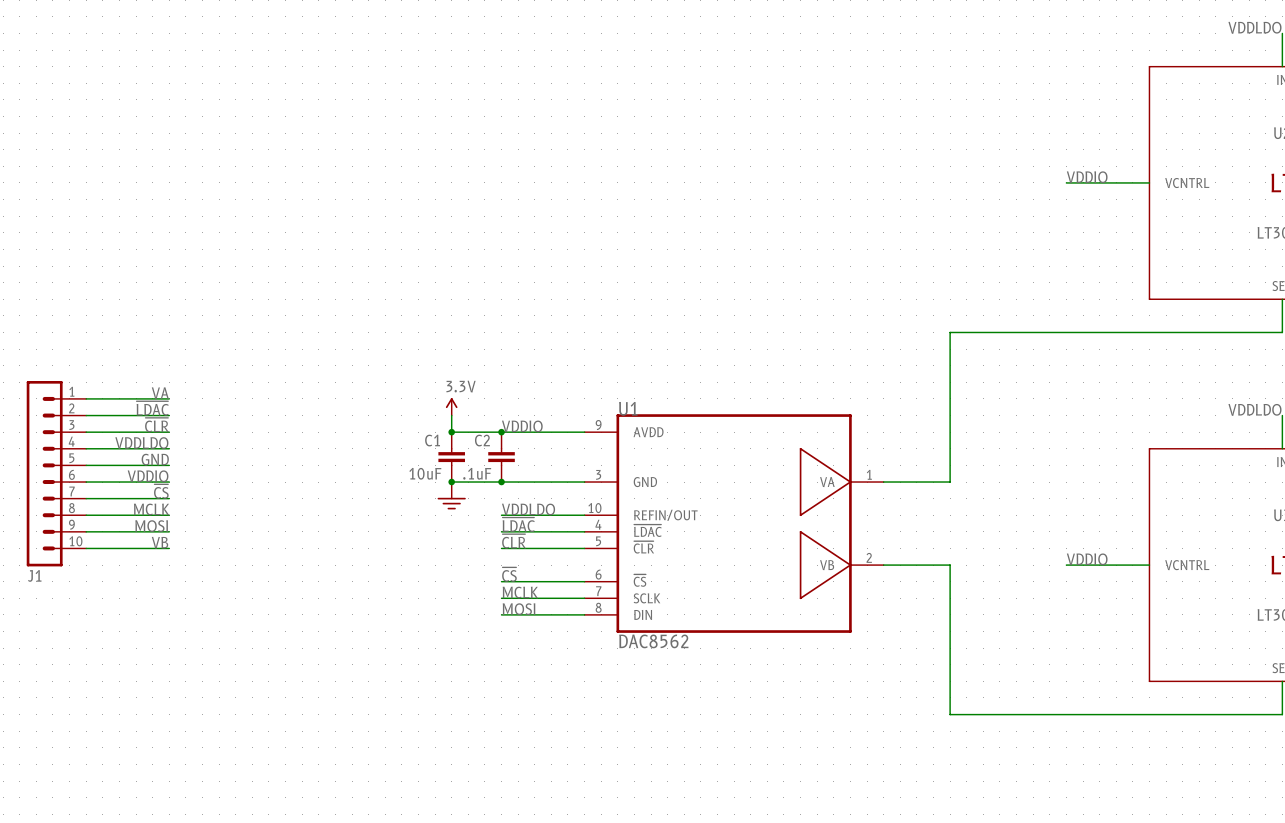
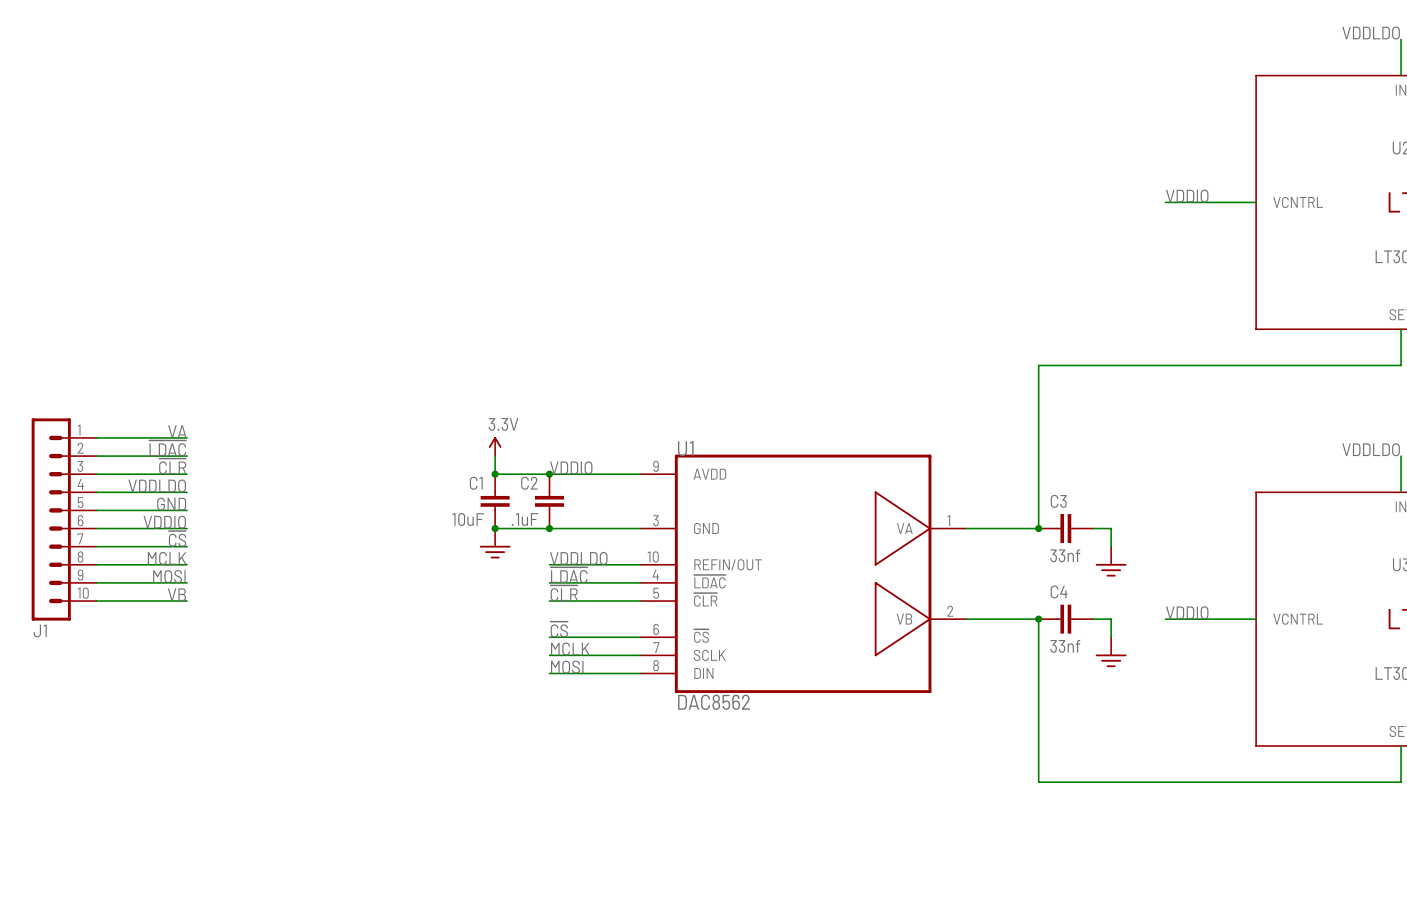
junction: none -> (1038, 528)
C3: none -> 33nf (1065, 528)
wire: none -> (1093, 528) (1111, 528) (1111, 546)
power symbol: none -> (1111, 561)
junction: none -> (1038, 619)
C4: none -> 33nf (1065, 619)
wire: none -> (1093, 619) (1111, 619) (1111, 637)
power symbol: none -> (1111, 652)

